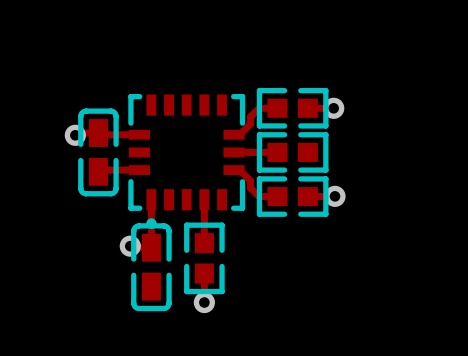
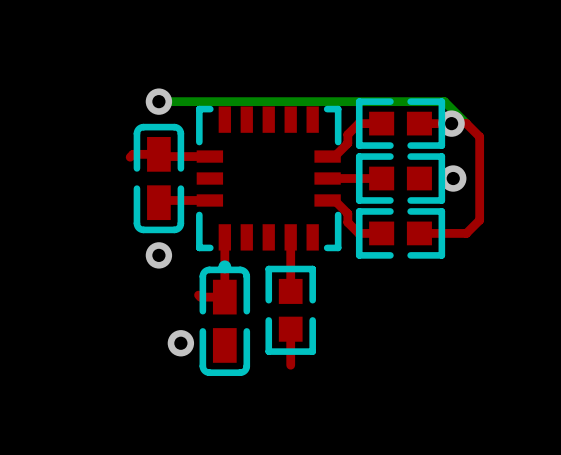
bottom track: none -> (158, 101) (444, 101) (466, 123)
via: none -> (158, 101)
top track: none -> (451, 123) (466, 123) (479, 136) (479, 220) (466, 233) (452, 233)
via: (75, 135) -> none
via position: (334, 196) -> (453, 178)
via: none -> (158, 255)
via: (130, 246) -> none
via: none -> (180, 343)
via: (204, 302) -> none

